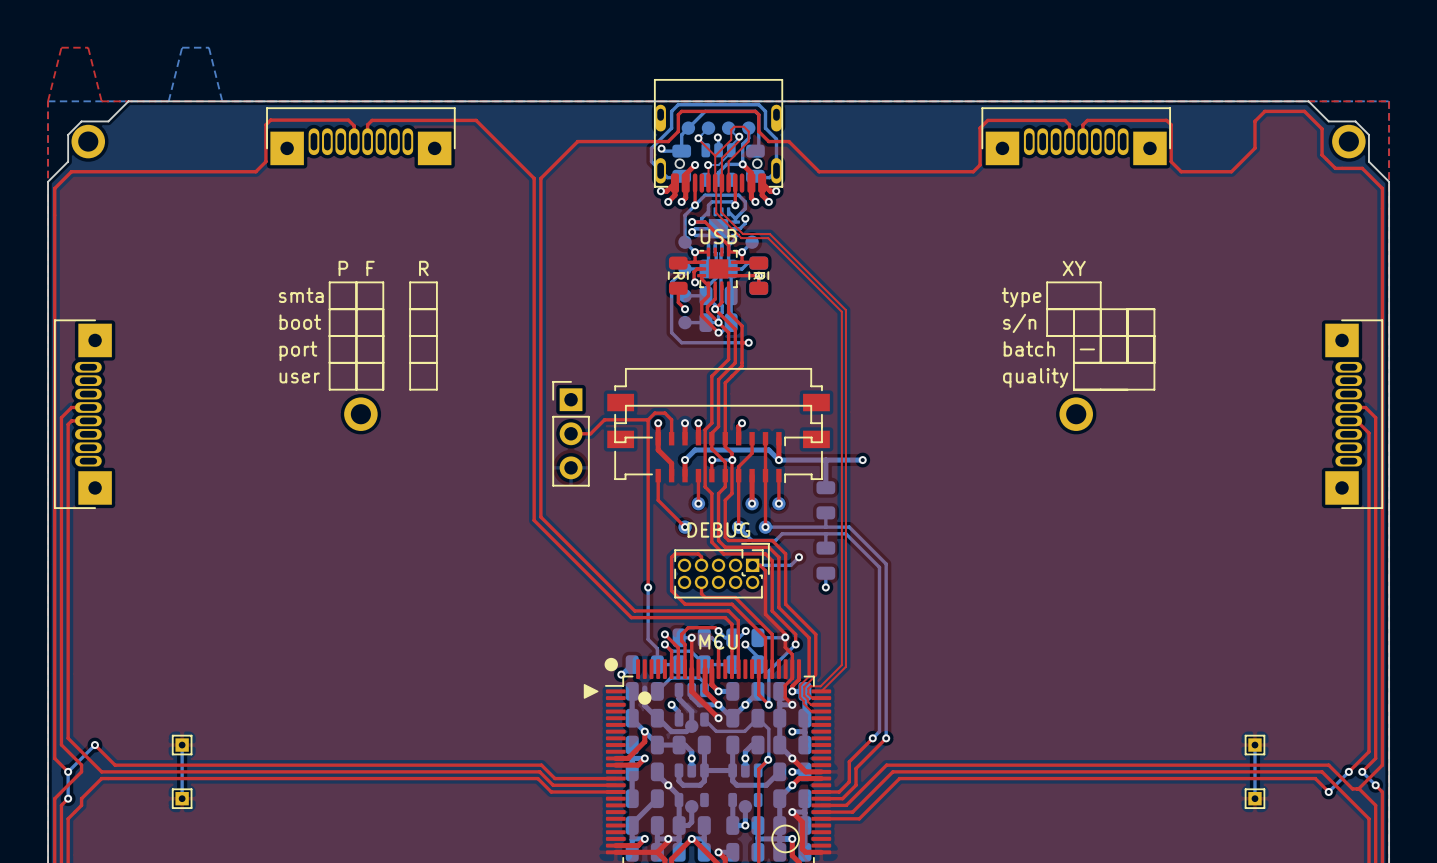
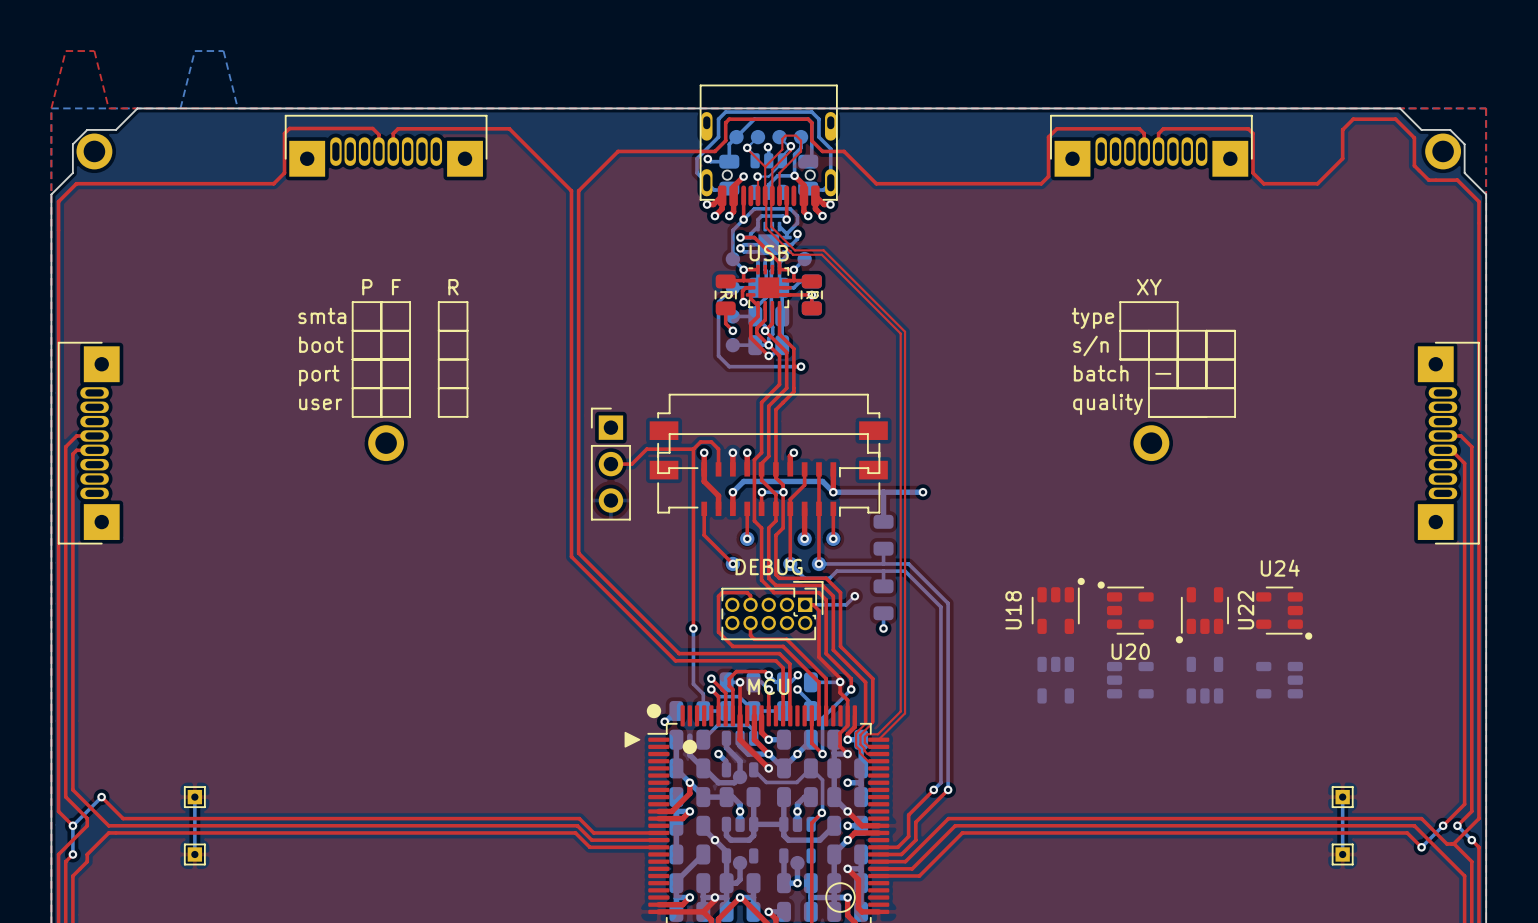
U18: none -> (1058, 605)
U20: none -> (1125, 608)
U24: none -> (1284, 613)
U22: none -> (1202, 615)
part: none -> (1055, 680)
part: none -> (1130, 680)
part: none -> (1204, 680)
part: none -> (1279, 680)

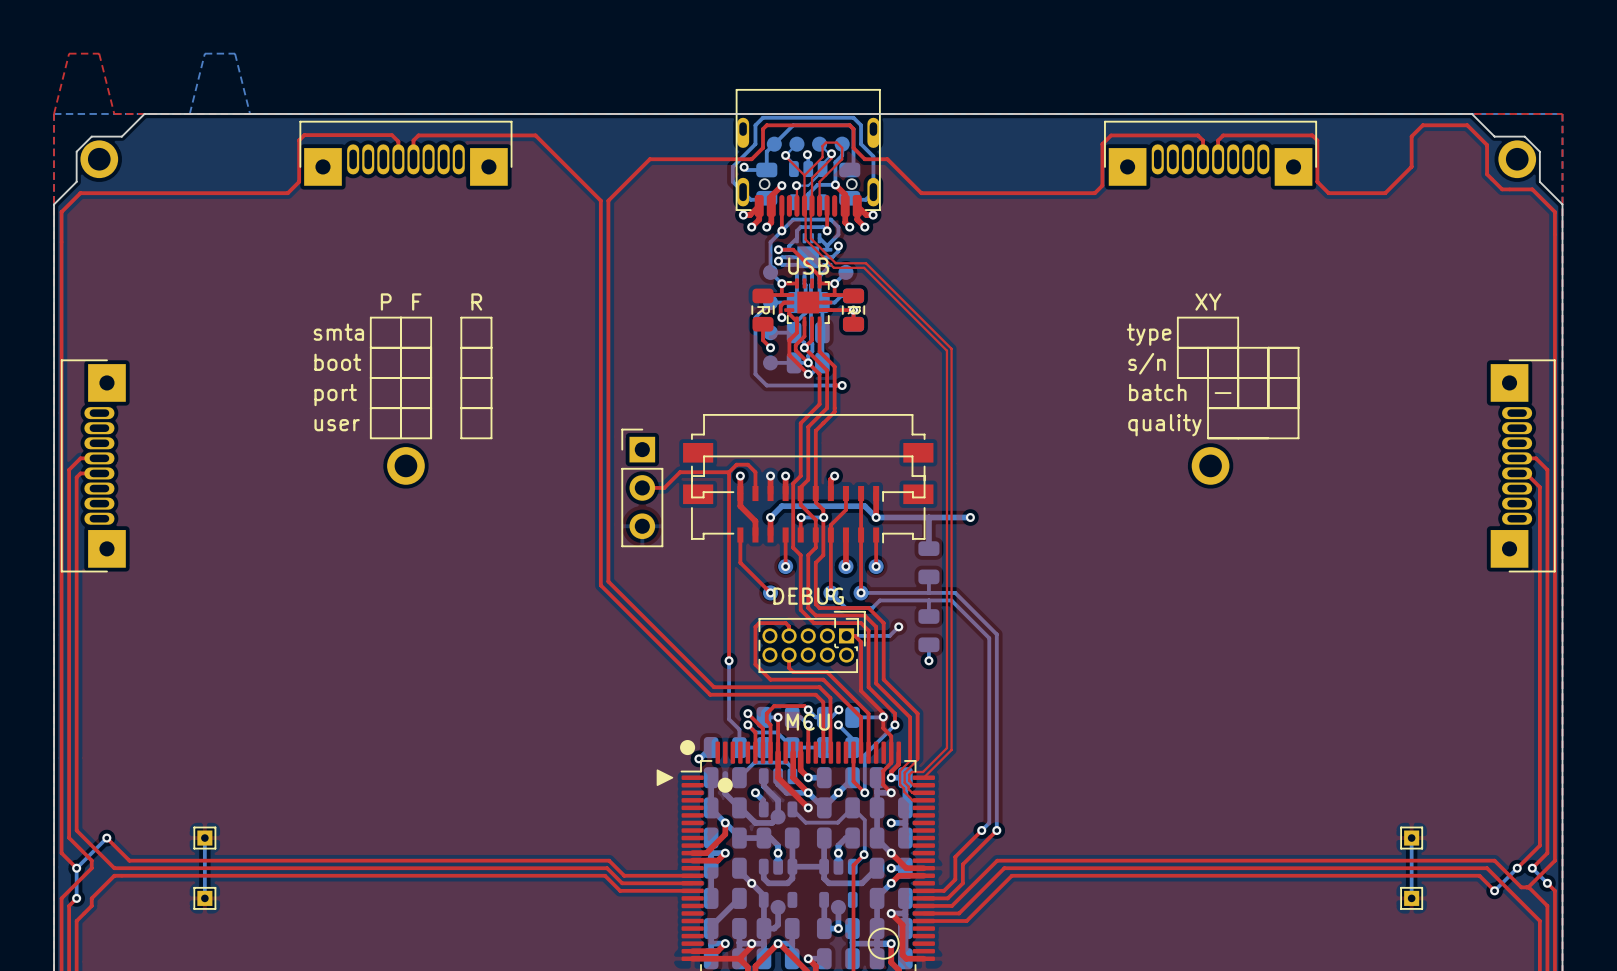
U18: (1058, 605) -> none
U20: (1125, 608) -> none
U24: (1284, 613) -> none
U22: (1202, 615) -> none
part: (1055, 680) -> none
part: (1130, 680) -> none
part: (1204, 680) -> none
part: (1279, 680) -> none

